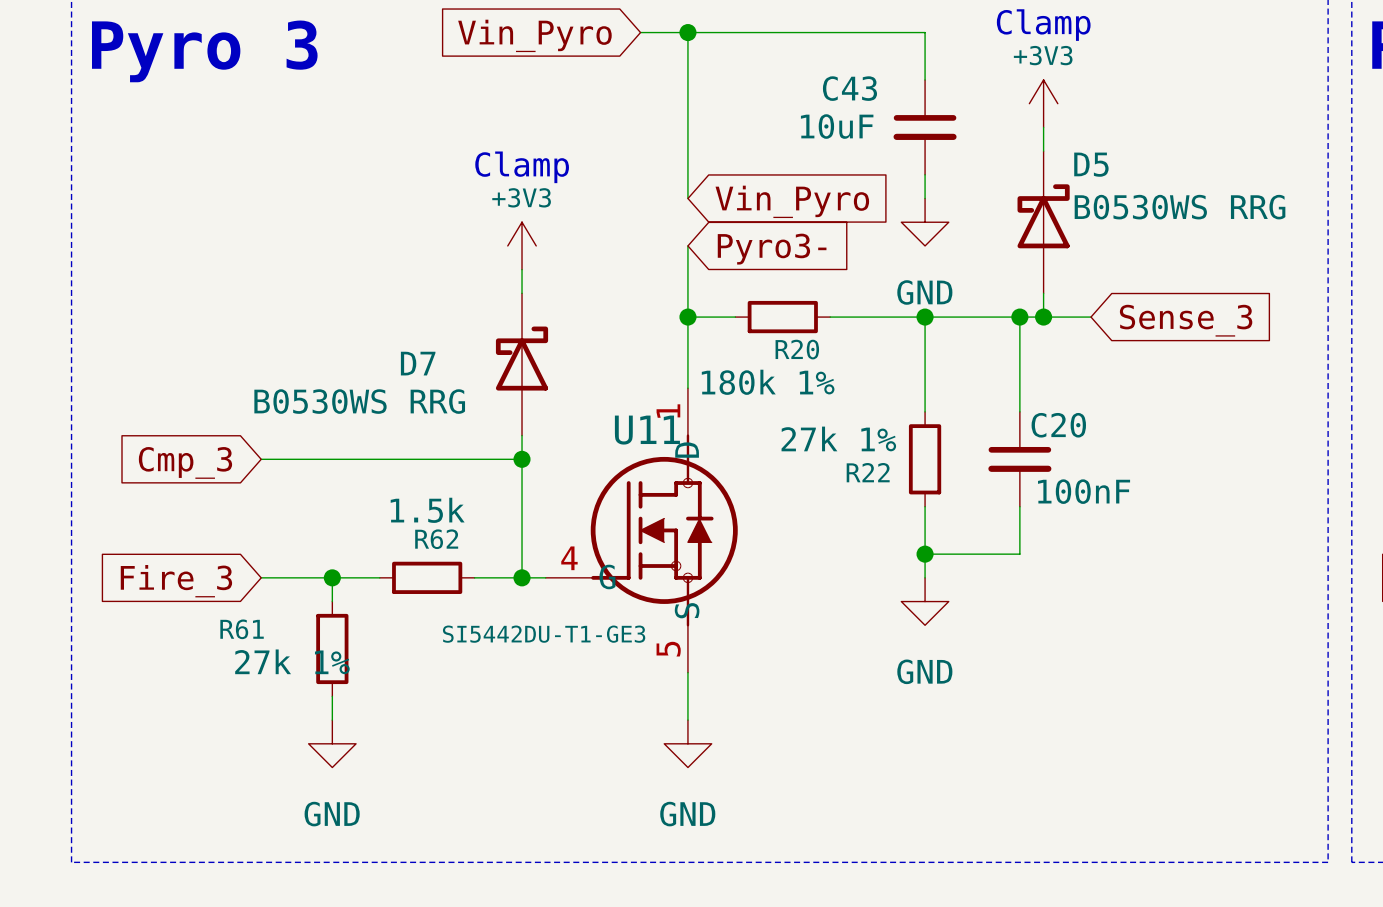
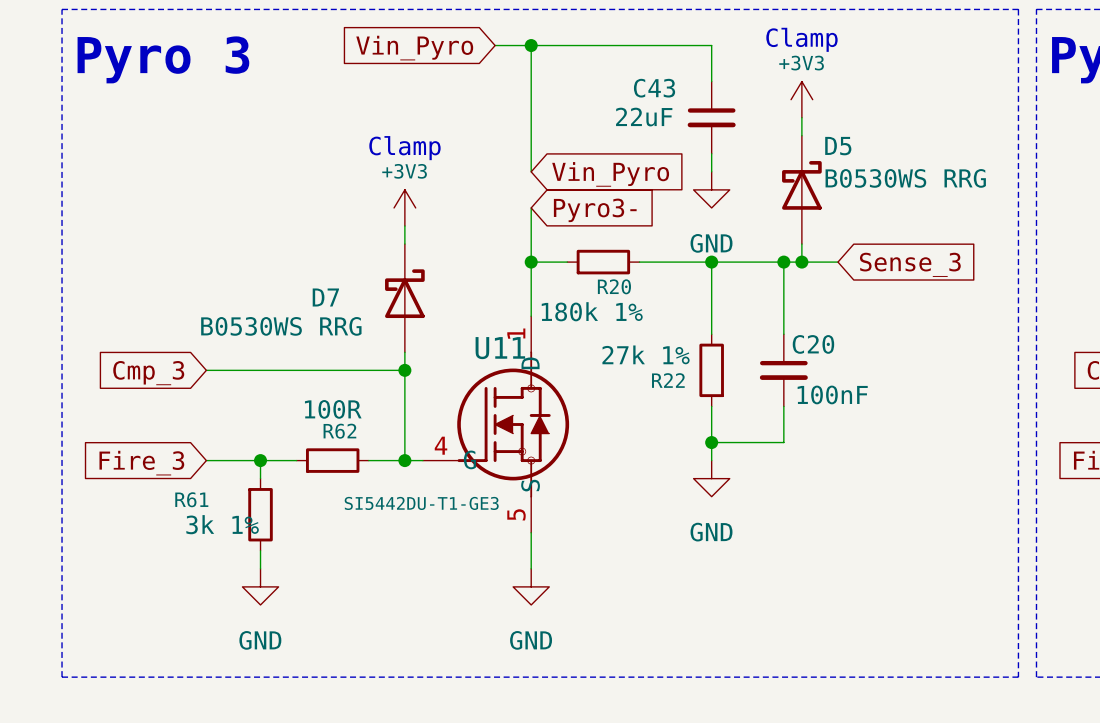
C43 value: 10uF (837, 126) -> 22uF (644, 117)
R62 value: 1.5k (427, 510) -> 100R (333, 409)
R61 value: 27k 1% (292, 661) -> 3k 1% (222, 524)

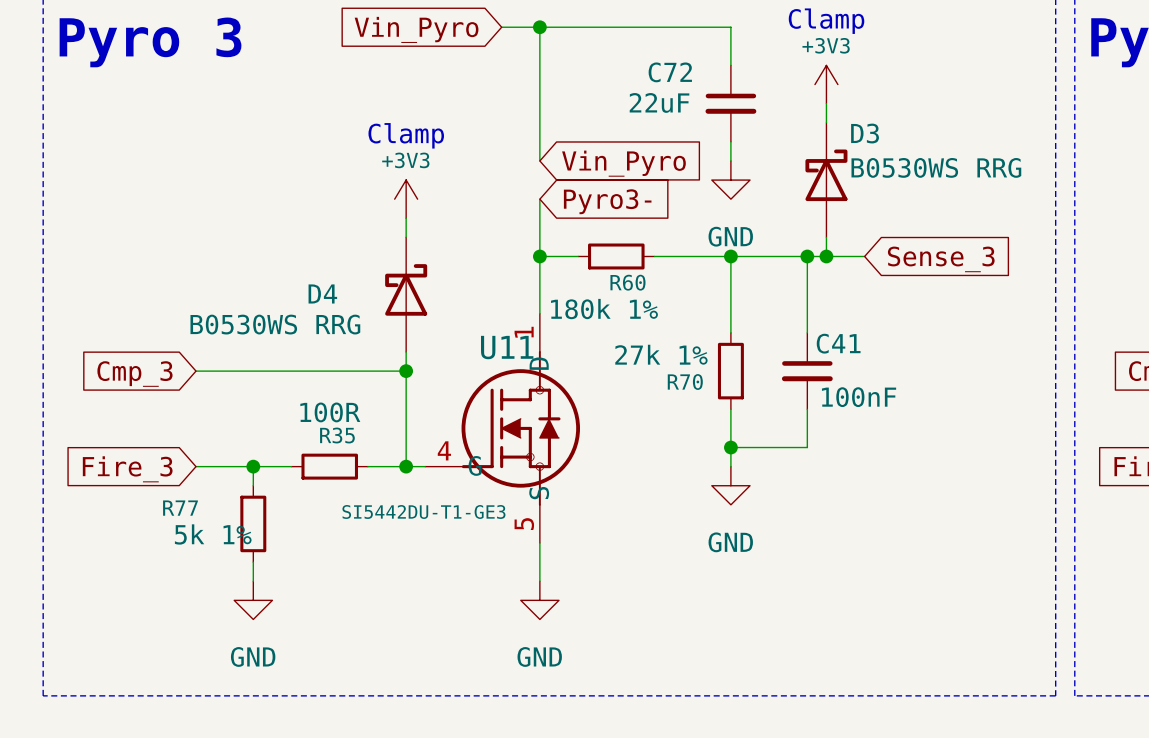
C43 name: C43 (654, 88) -> C72 (670, 72)
D5 name: D5 (838, 146) -> D3 (865, 133)
R20 name: R20 (614, 286) -> R60 (627, 282)
D7 name: D7 (325, 297) -> D4 (322, 293)
C20 name: C20 (813, 344) -> C41 (838, 343)
R22 name: R22 (668, 380) -> R70 (685, 382)
R62 name: R62 (339, 431) -> R35 (337, 435)
R61 name: R61 (191, 499) -> R77 (180, 508)
R61 value: 3k 1% (222, 524) -> 5k 1% (213, 534)

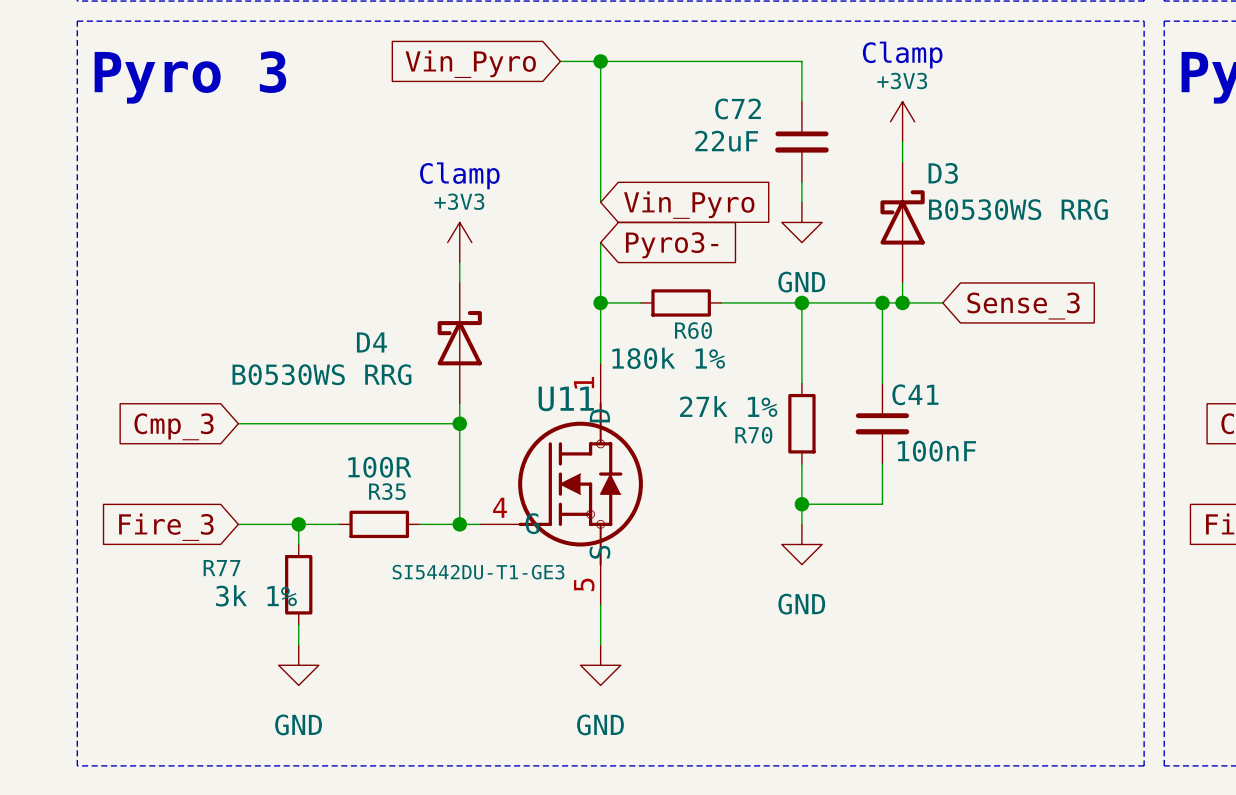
R77 value: 5k 1% (213, 534) -> 3k 1% (256, 595)

